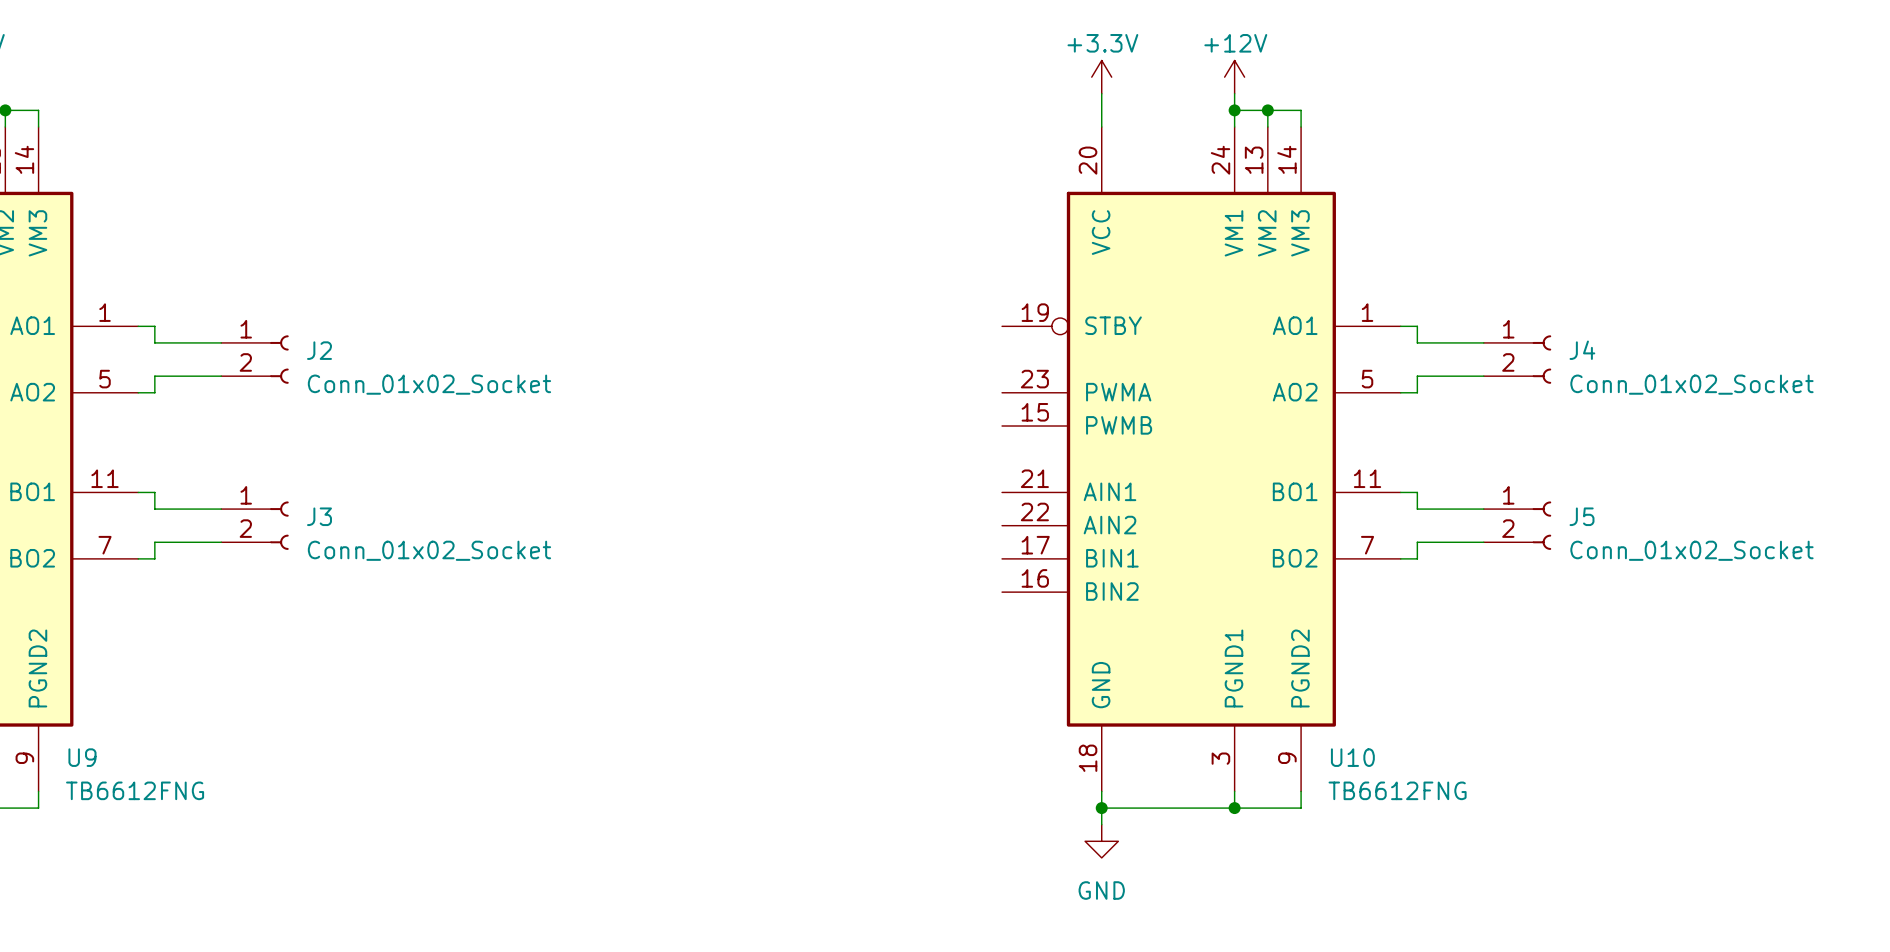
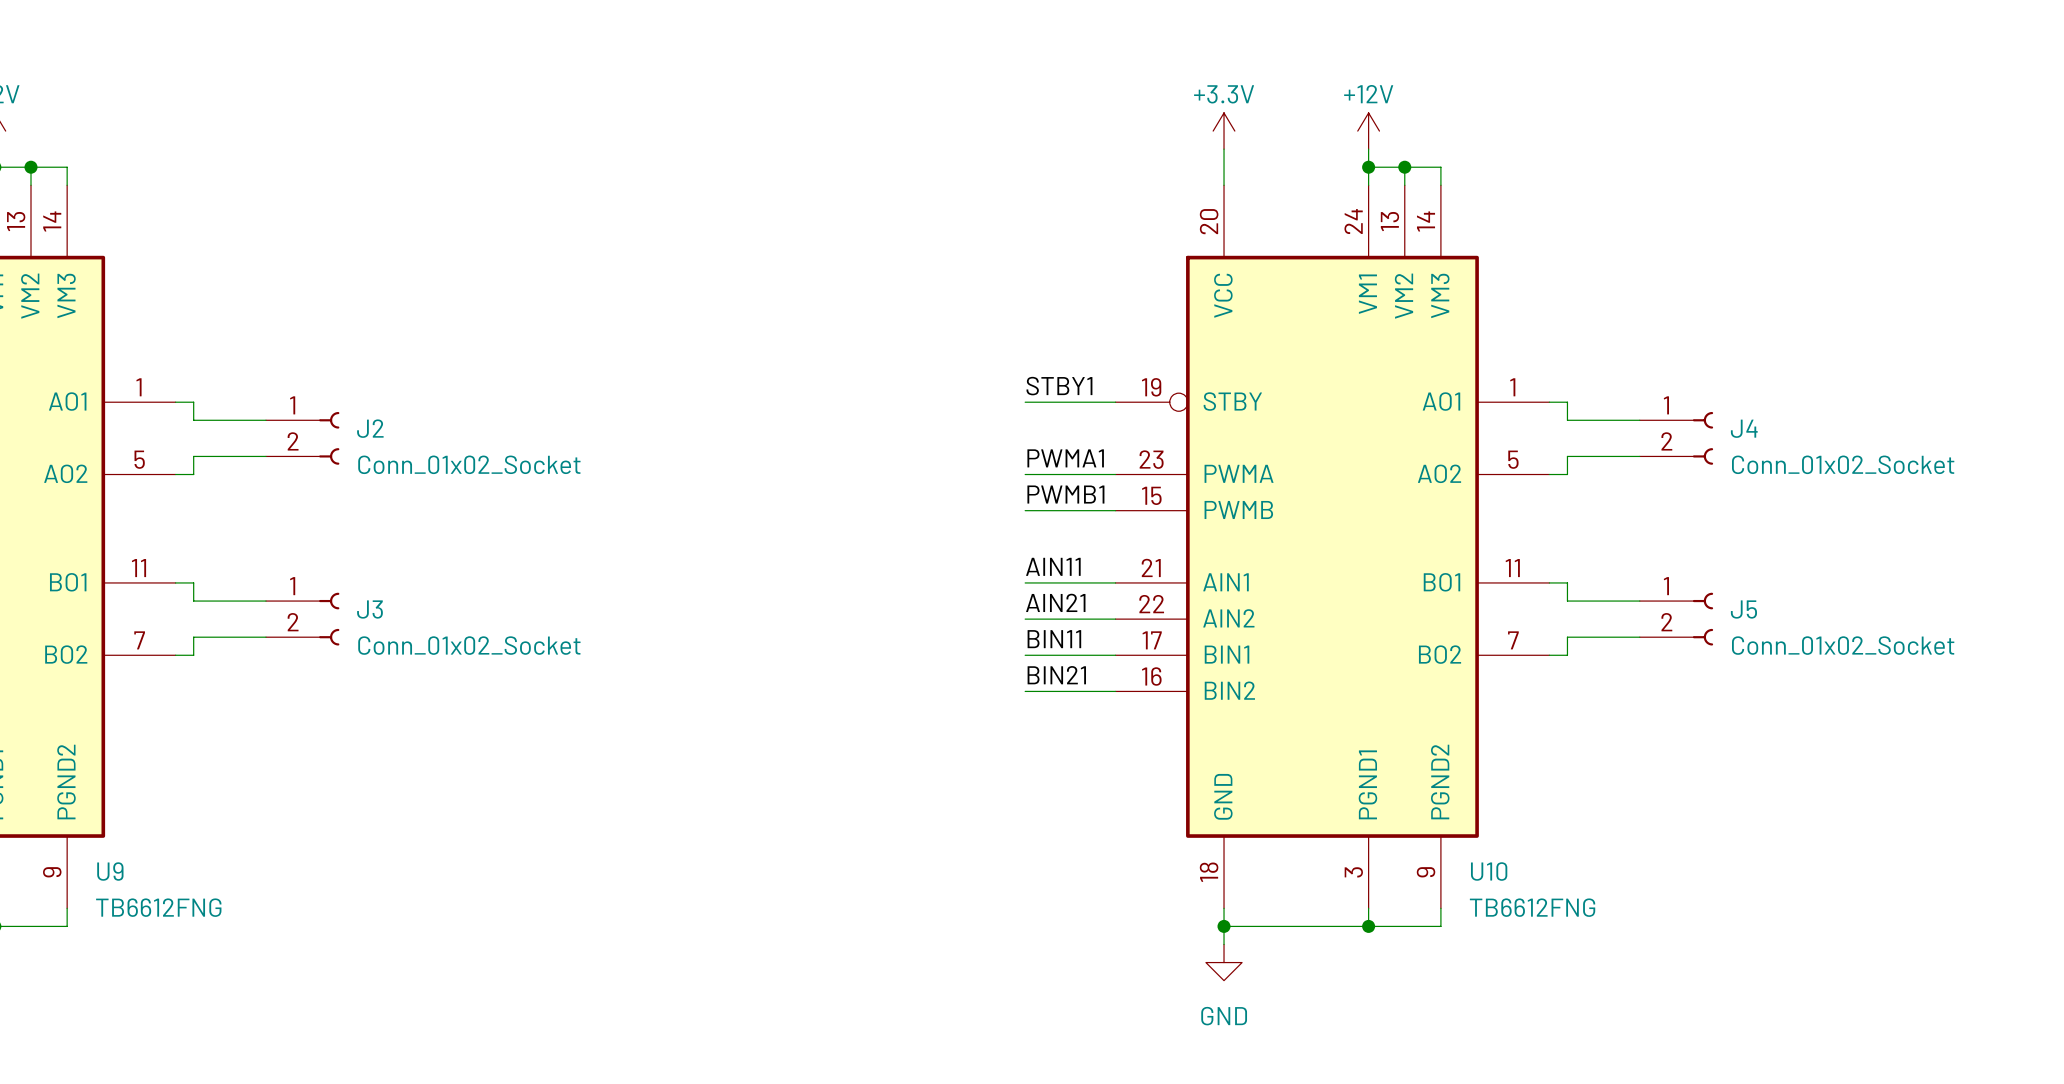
label: none -> STBY1 (1059, 386)
wire: none -> (1025, 402) (1115, 402)
label: none -> PWMA1 (1065, 458)
wire: none -> (1025, 474) (1115, 474)
label: none -> PWMB1 (1065, 494)
wire: none -> (1025, 510) (1115, 510)
label: none -> AIN11 (1053, 566)
wire: none -> (1025, 582) (1115, 582)
label: none -> AIN21 (1055, 602)
wire: none -> (1025, 619) (1115, 619)
label: none -> BIN11 (1054, 639)
wire: none -> (1025, 655) (1115, 655)
label: none -> BIN21 (1056, 675)
wire: none -> (1025, 691) (1115, 691)

